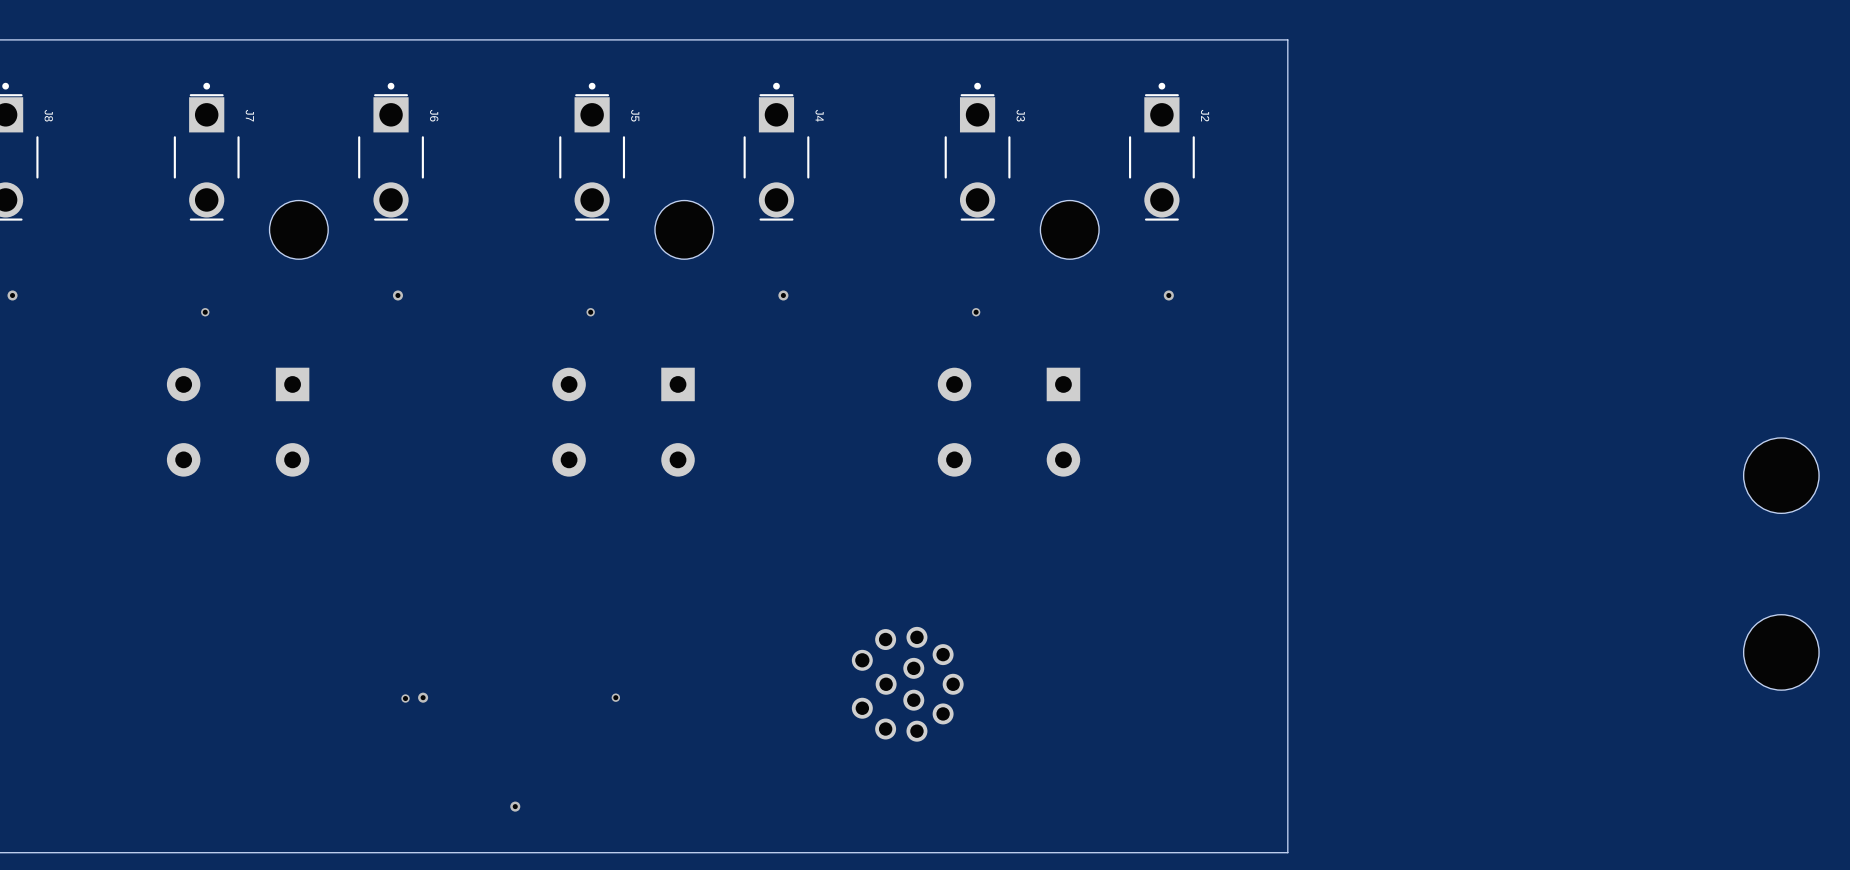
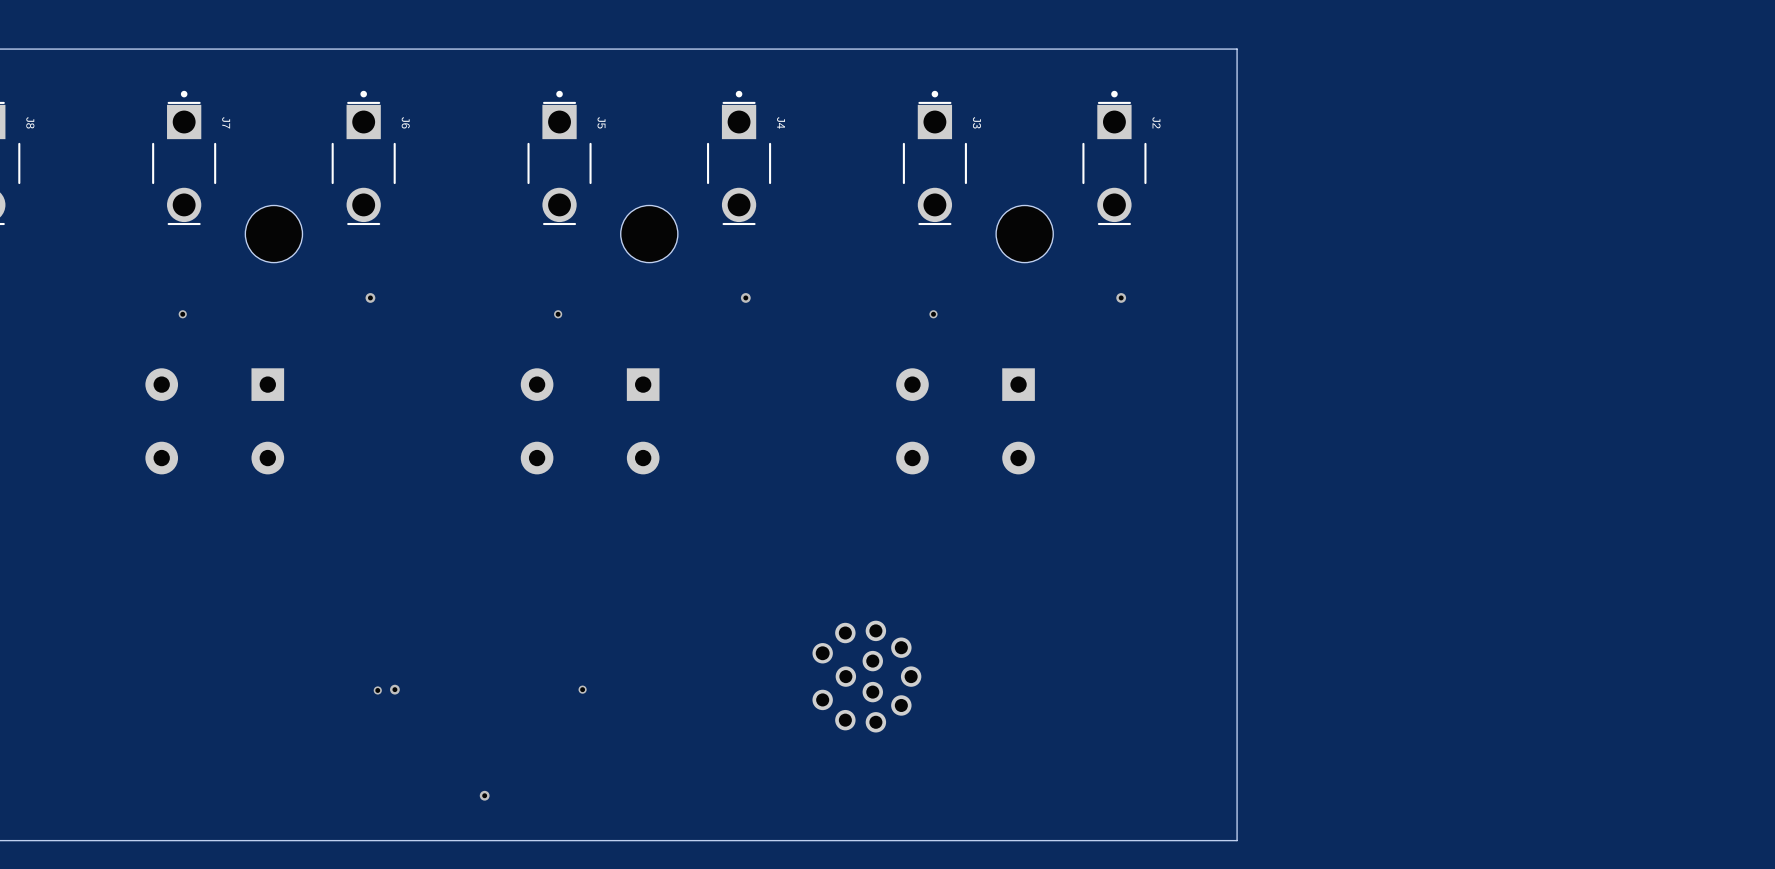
part: (1781, 475) -> none
part: (1781, 652) -> none

